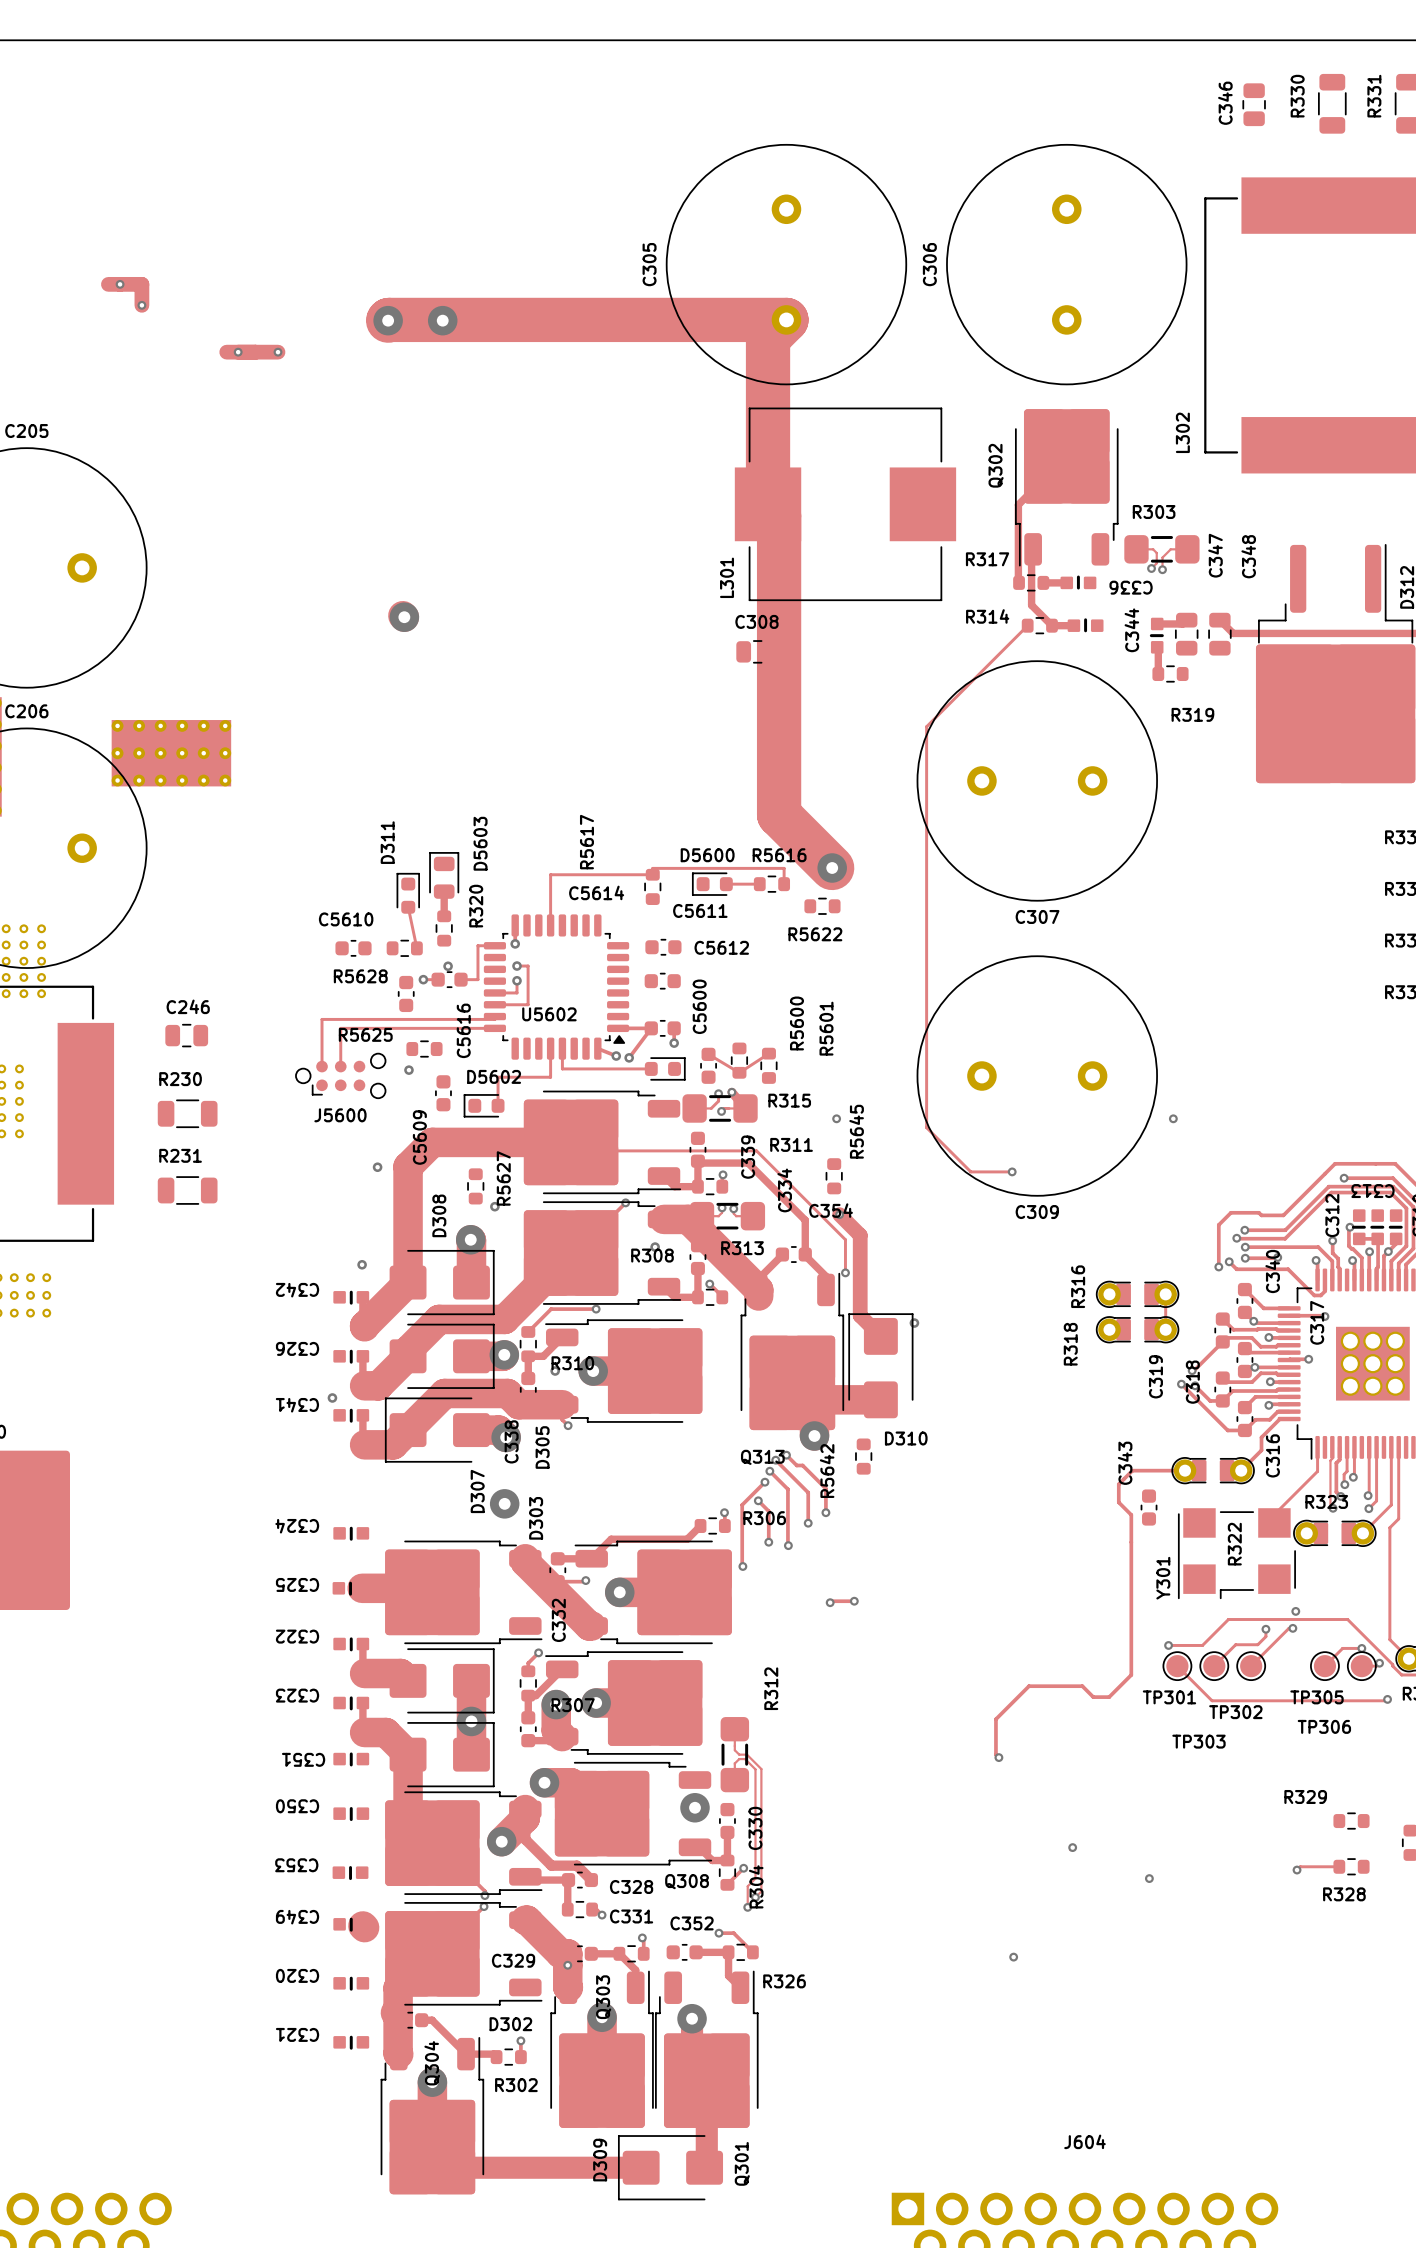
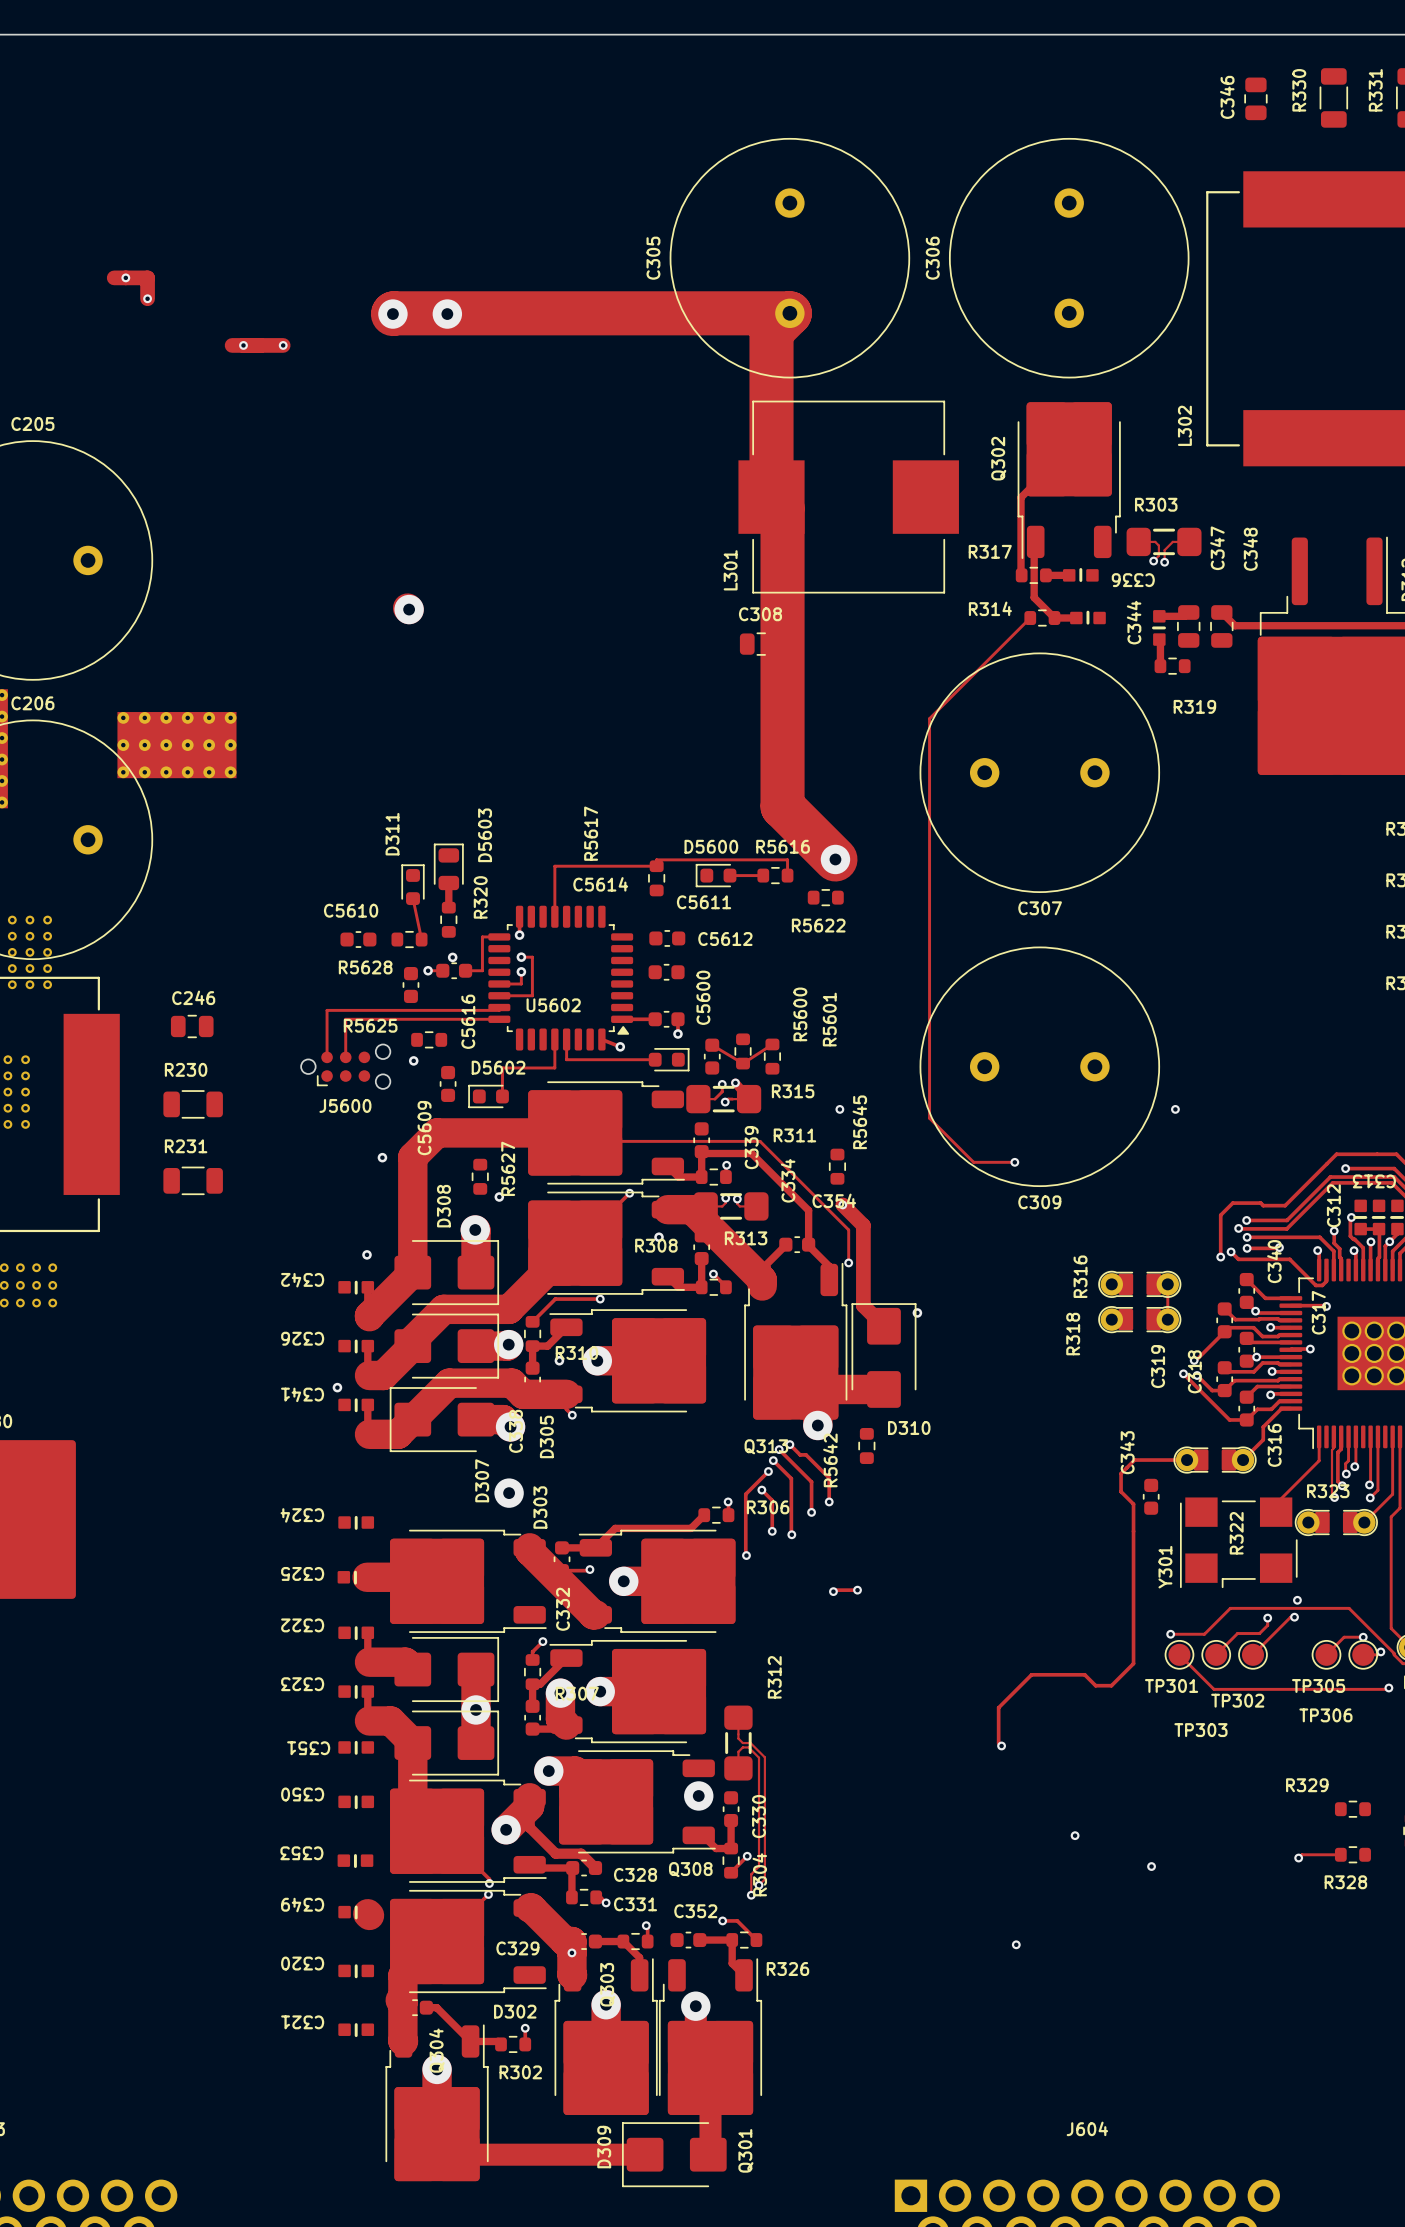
track: (651, 1028) (629, 1057) -> none
via: (629, 1057) -> none

